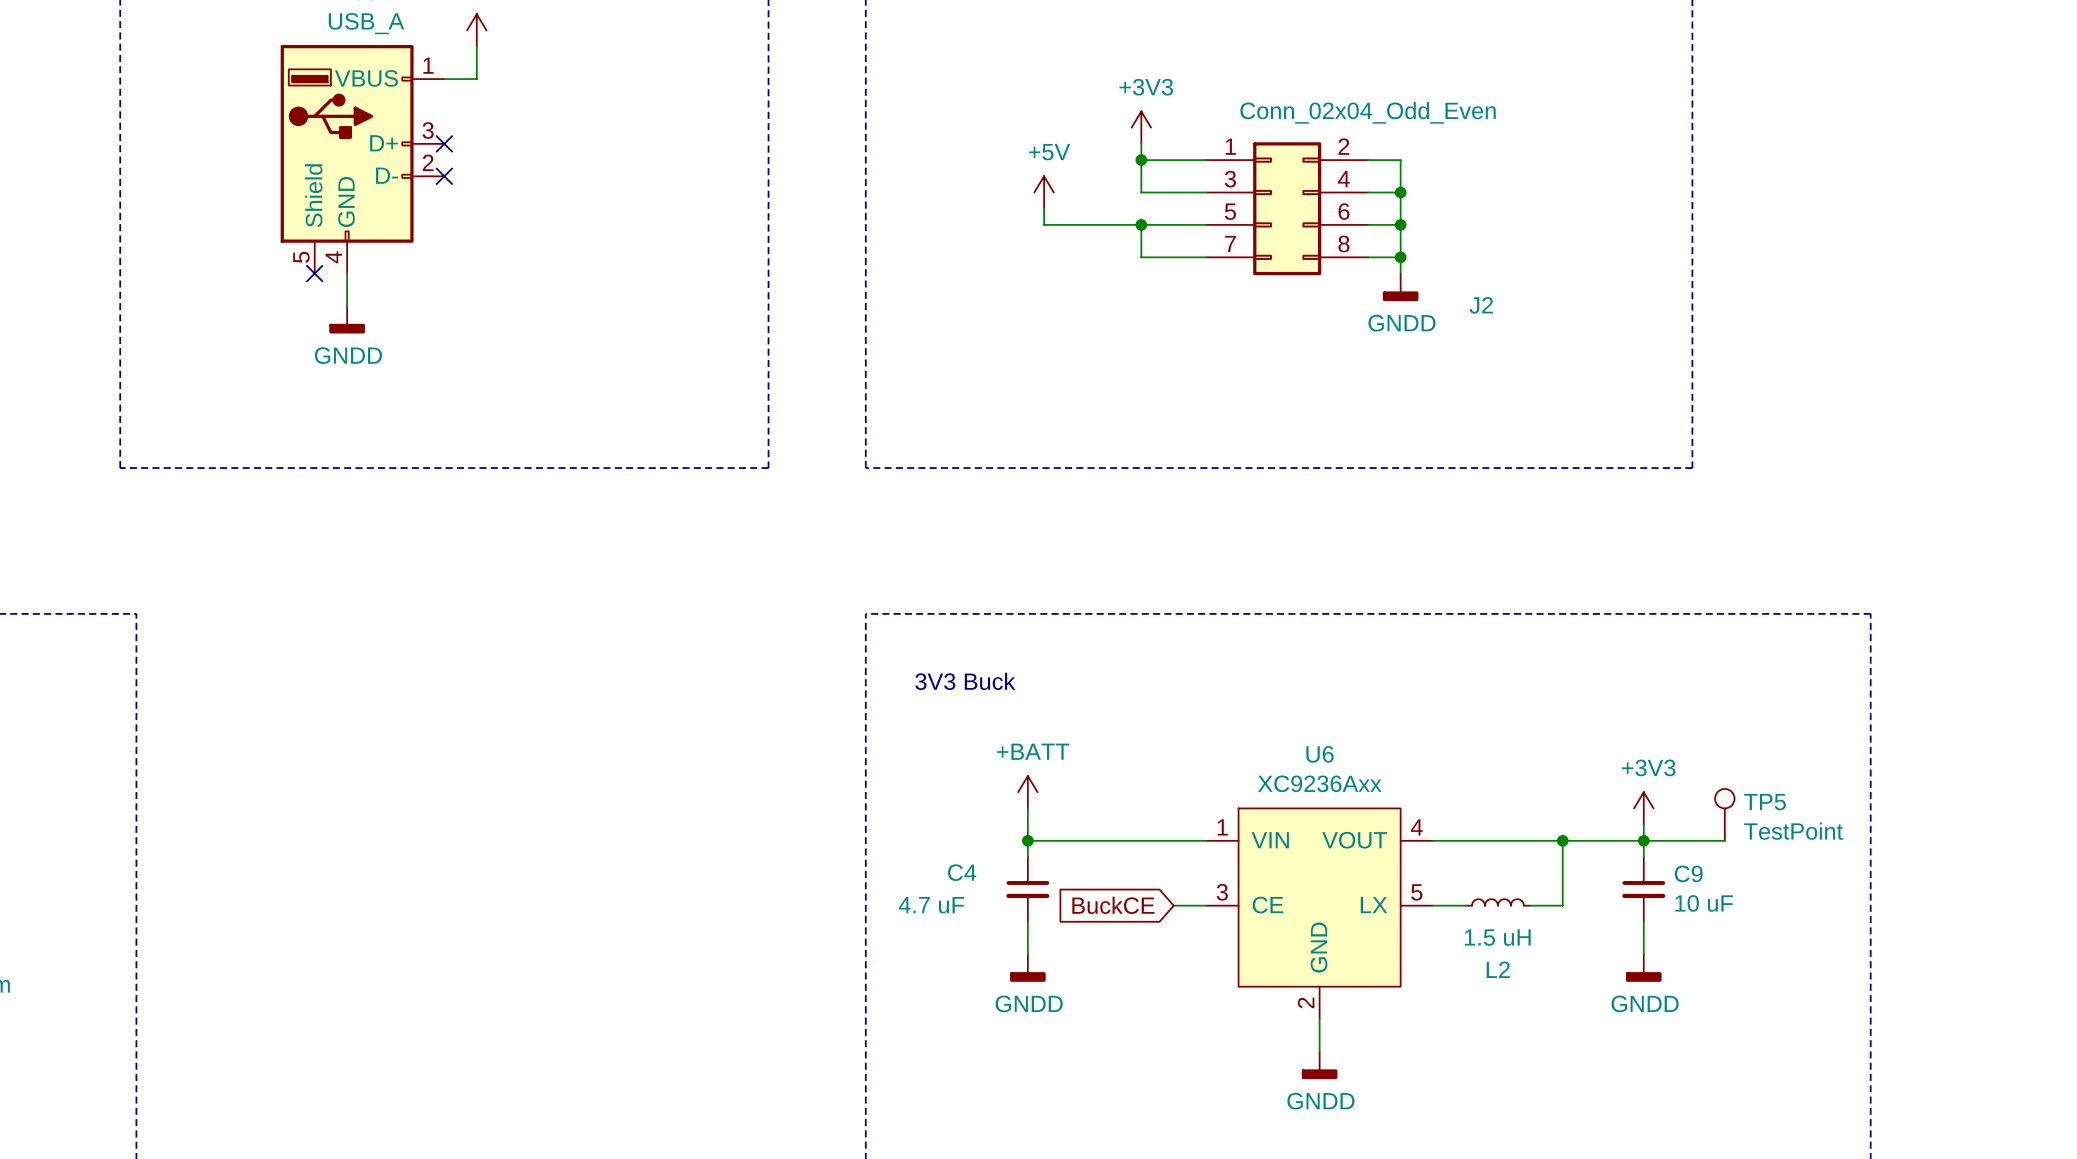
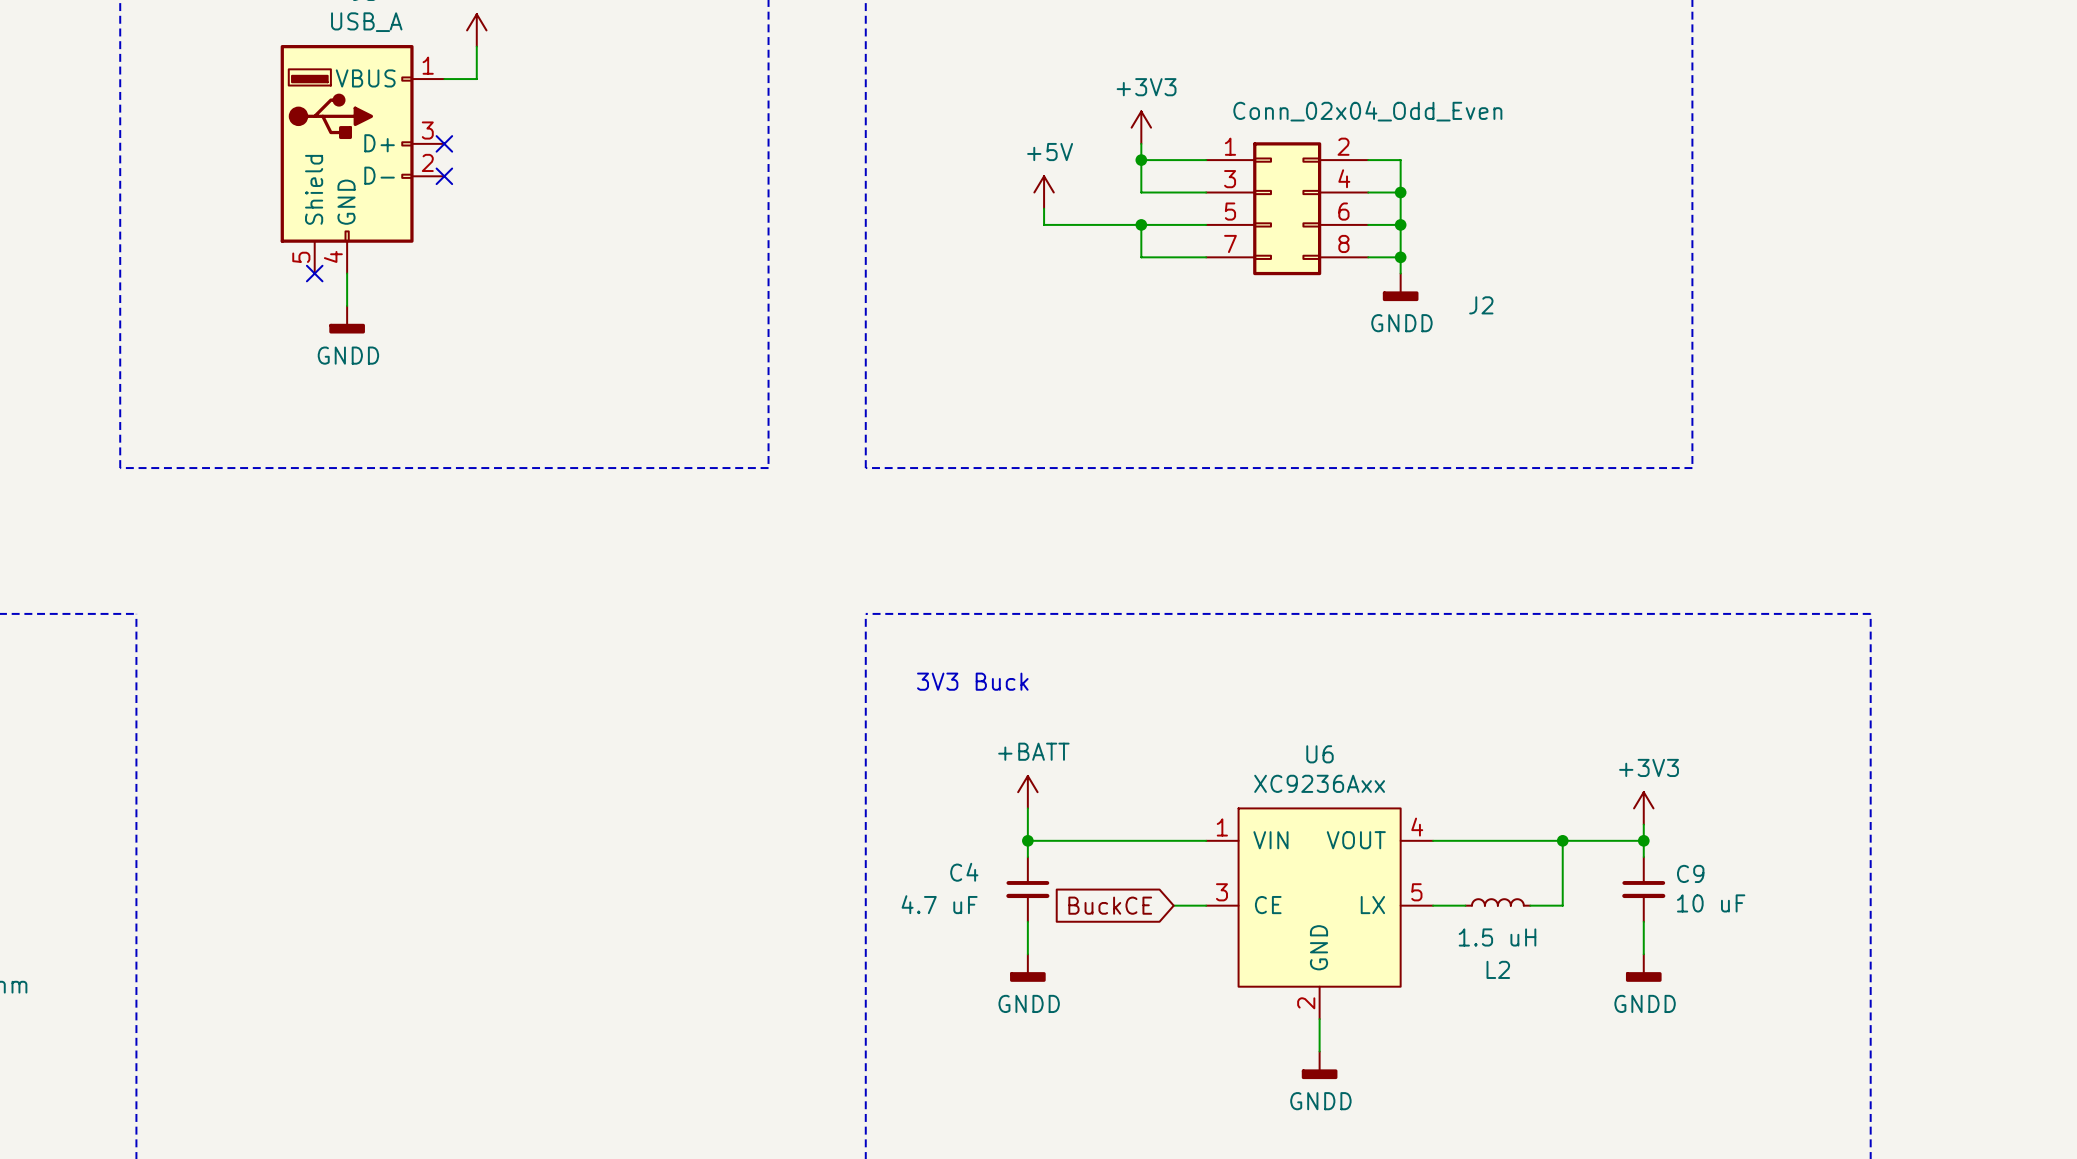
TP5: TestPoint (1724, 814) -> none
wire: (1643, 840) (1724, 840) -> none

